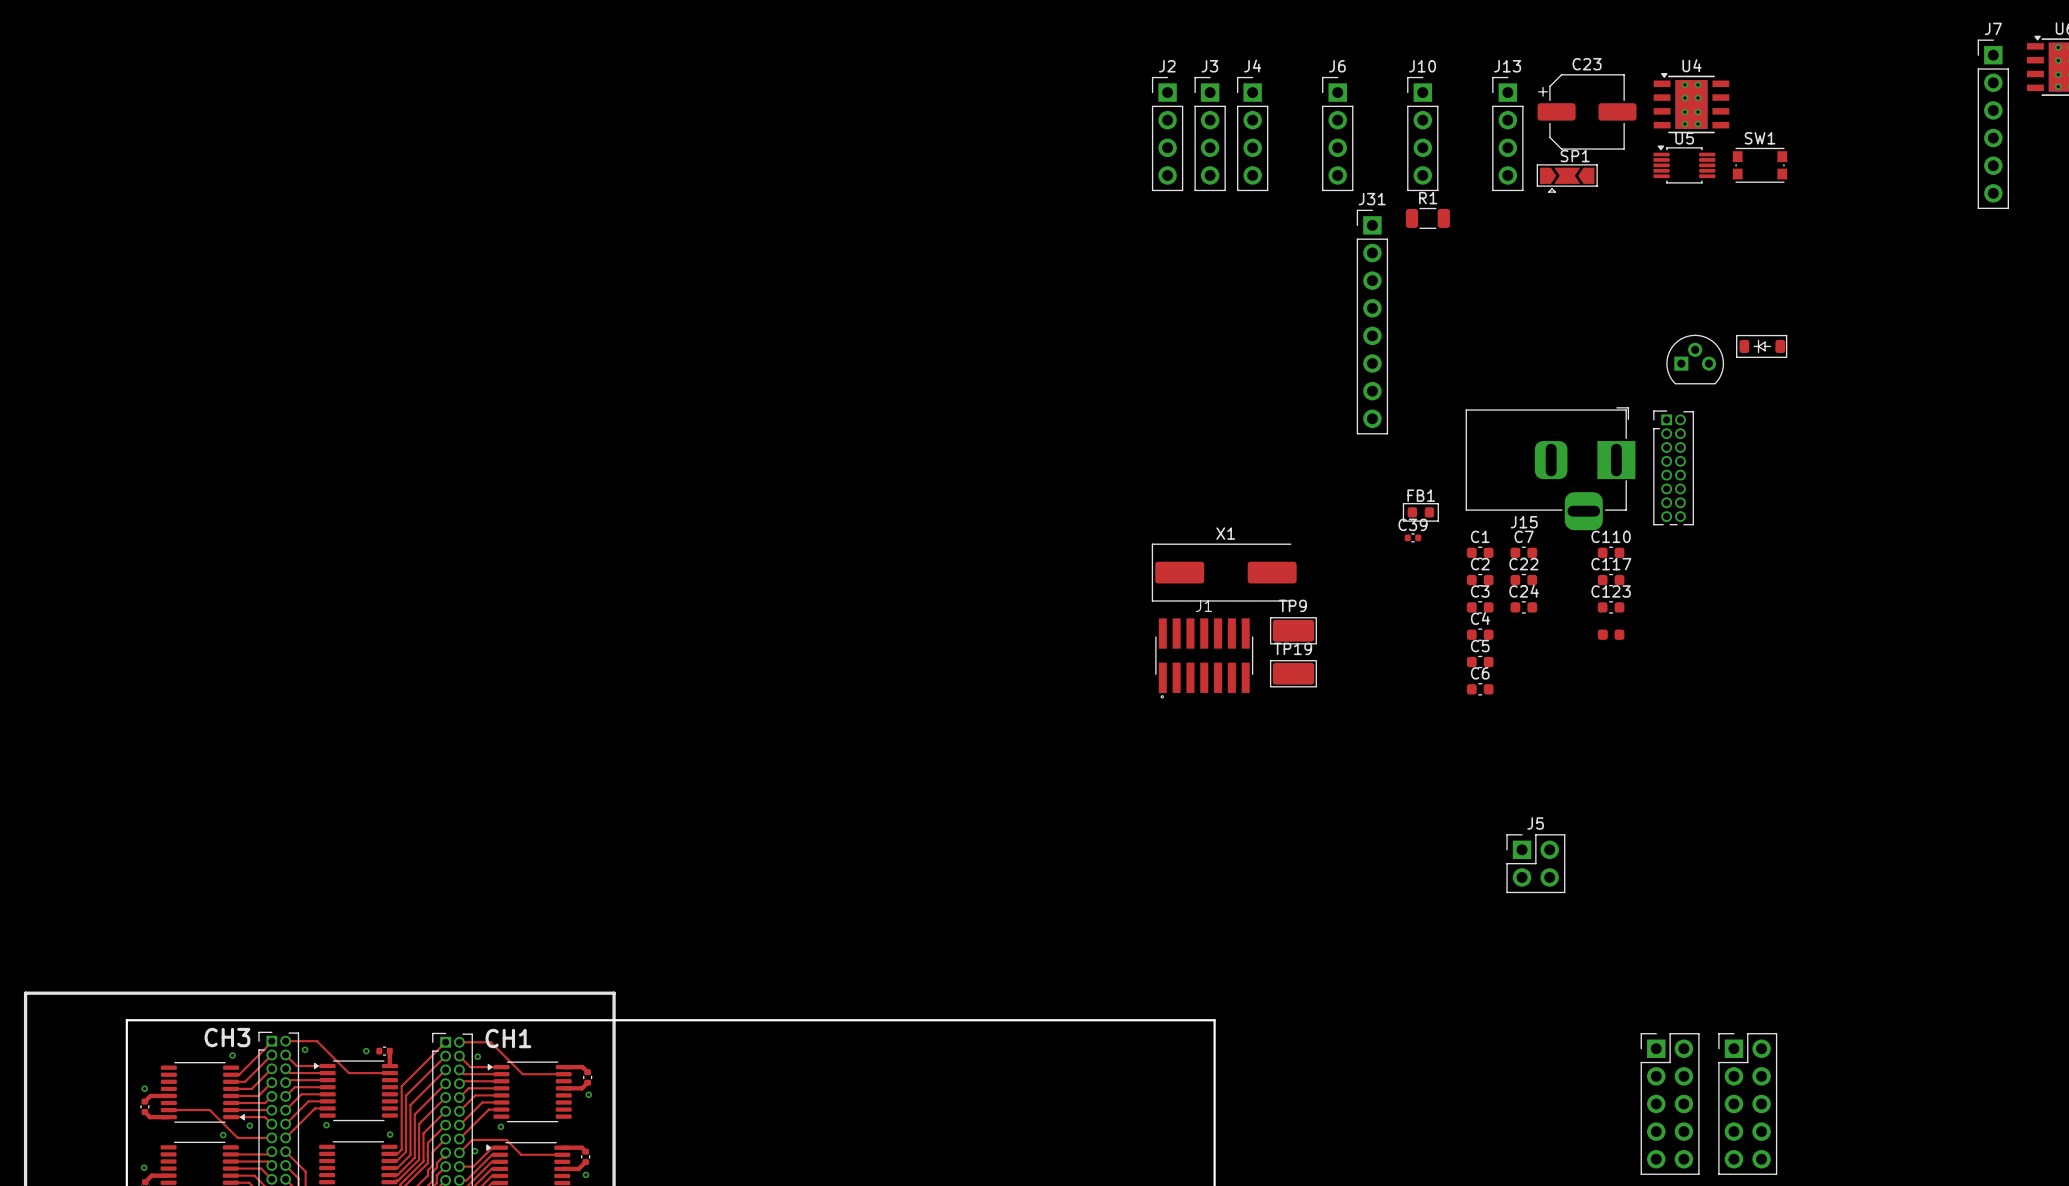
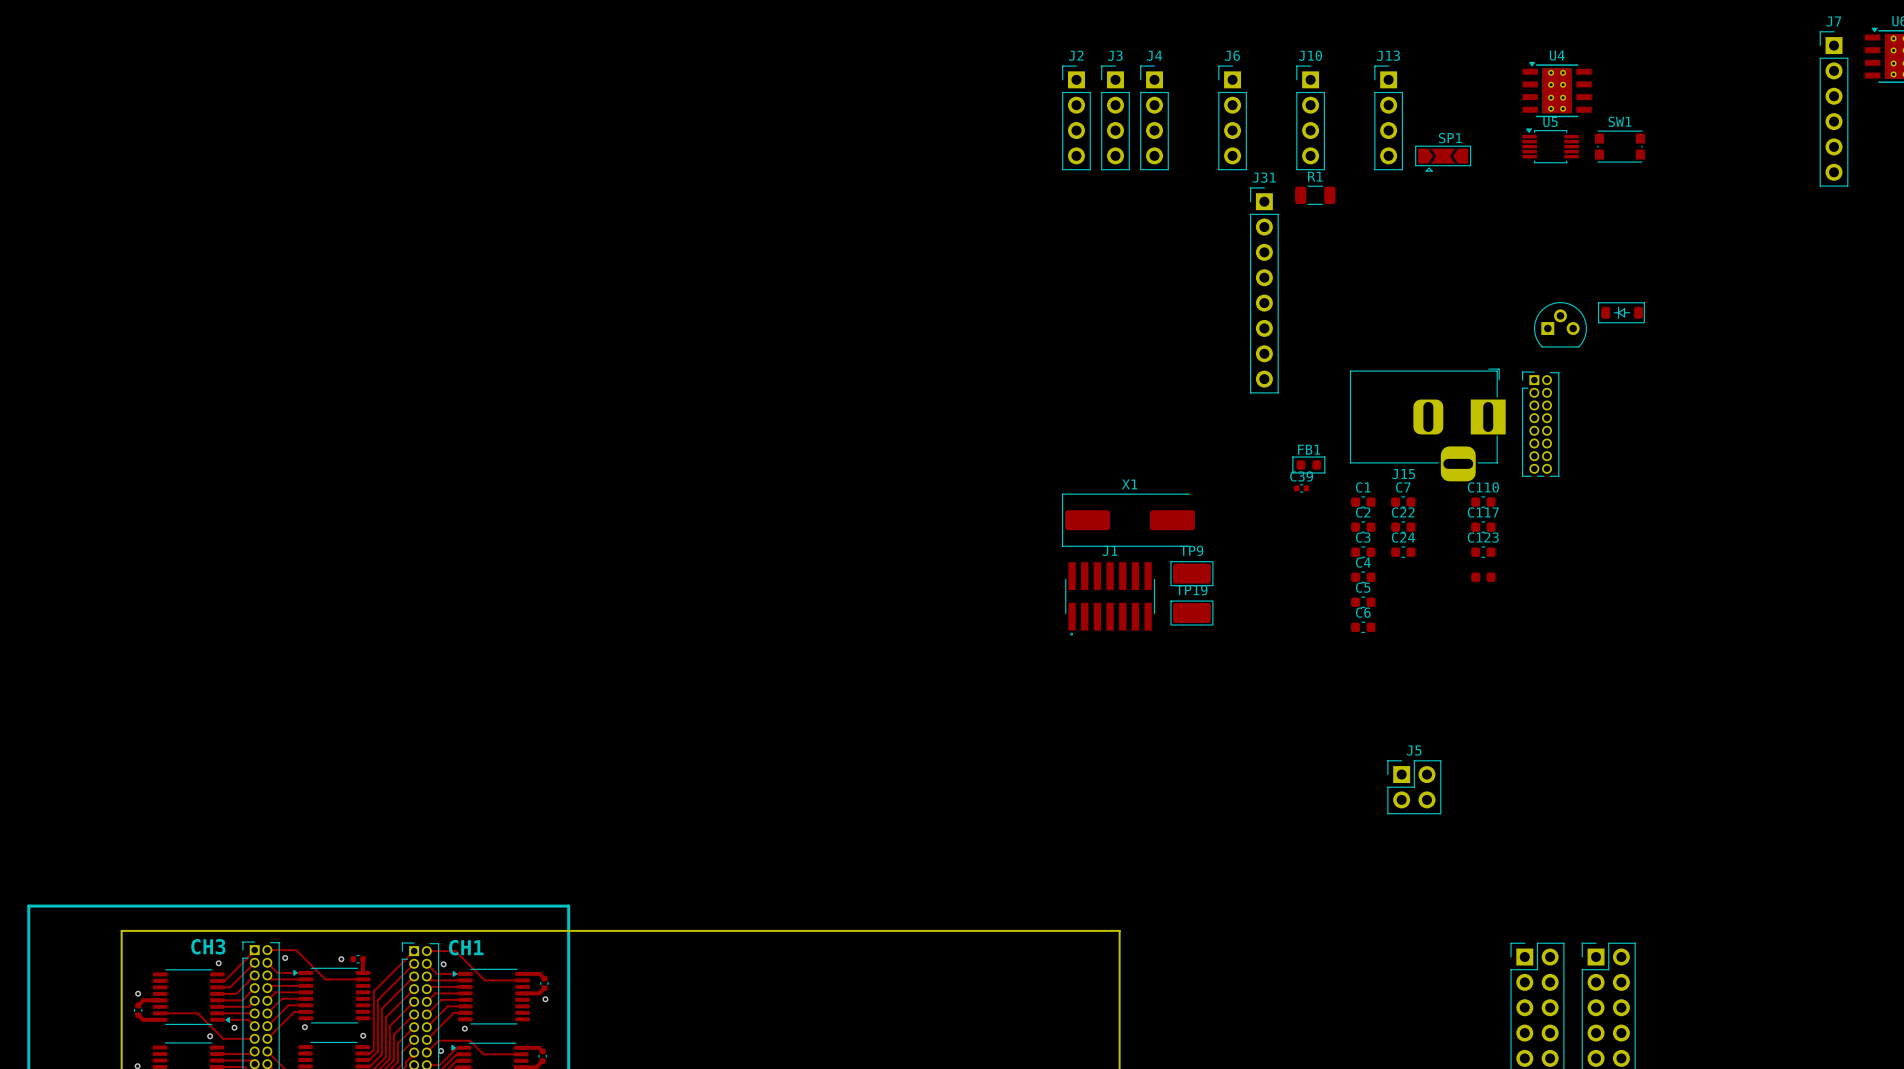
C23: (1587, 111) -> none

